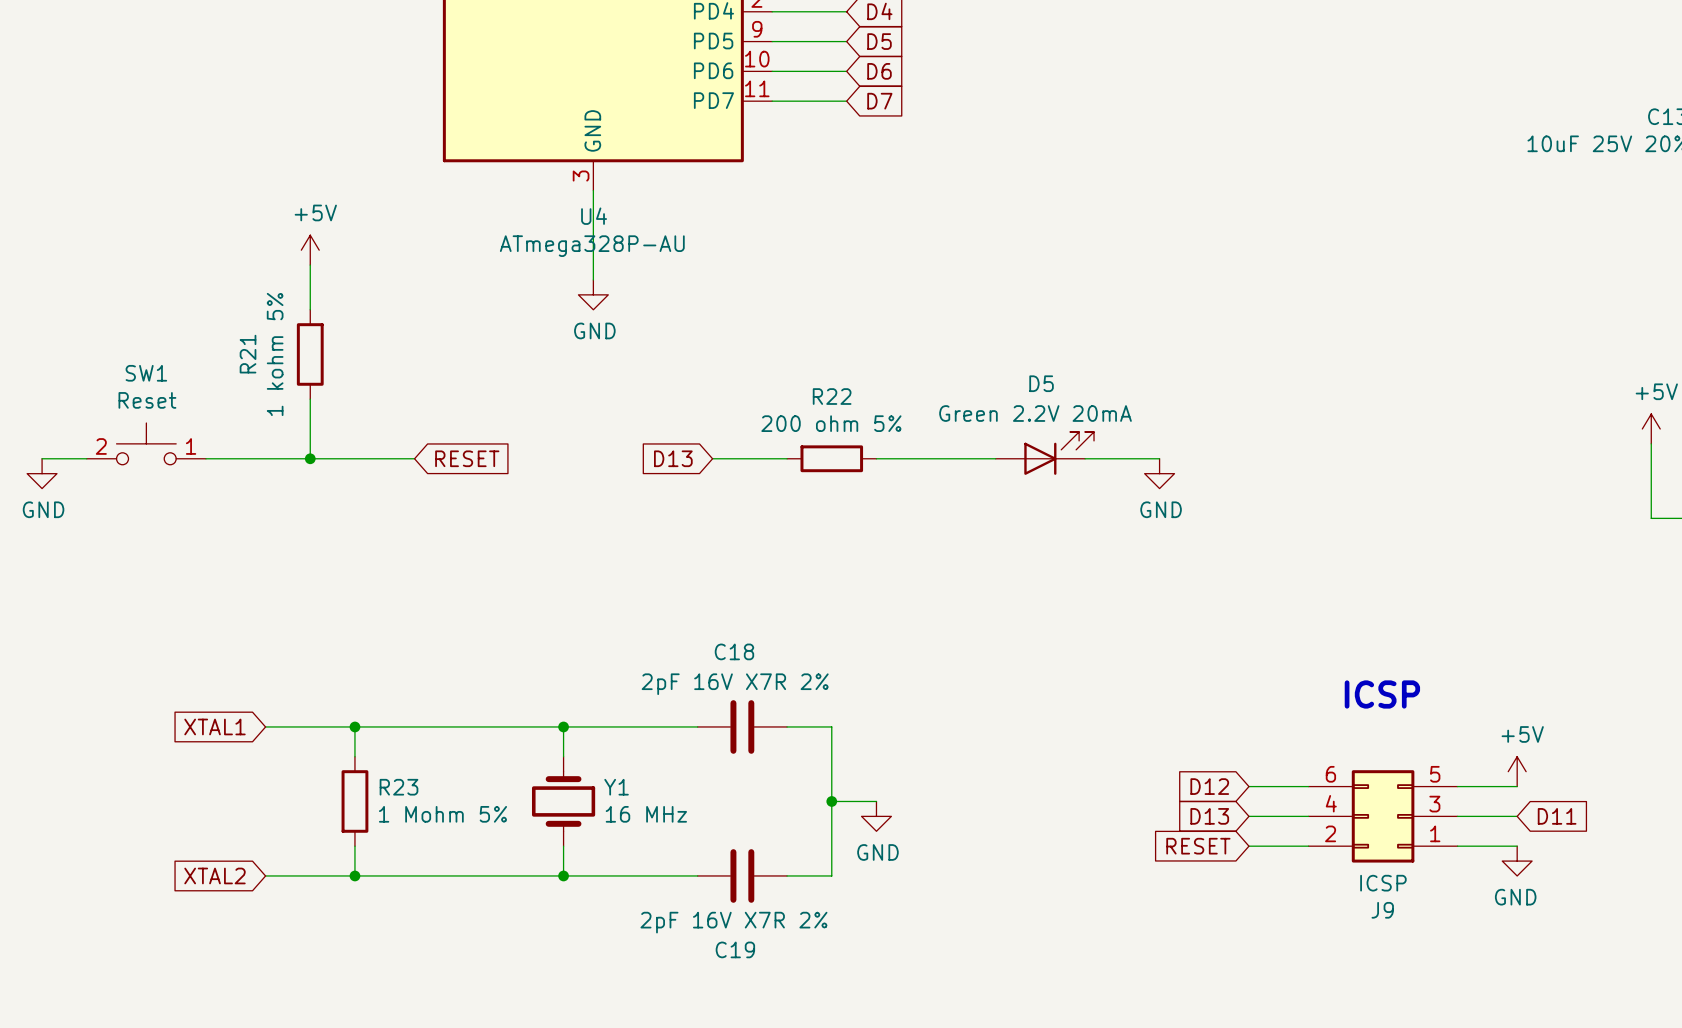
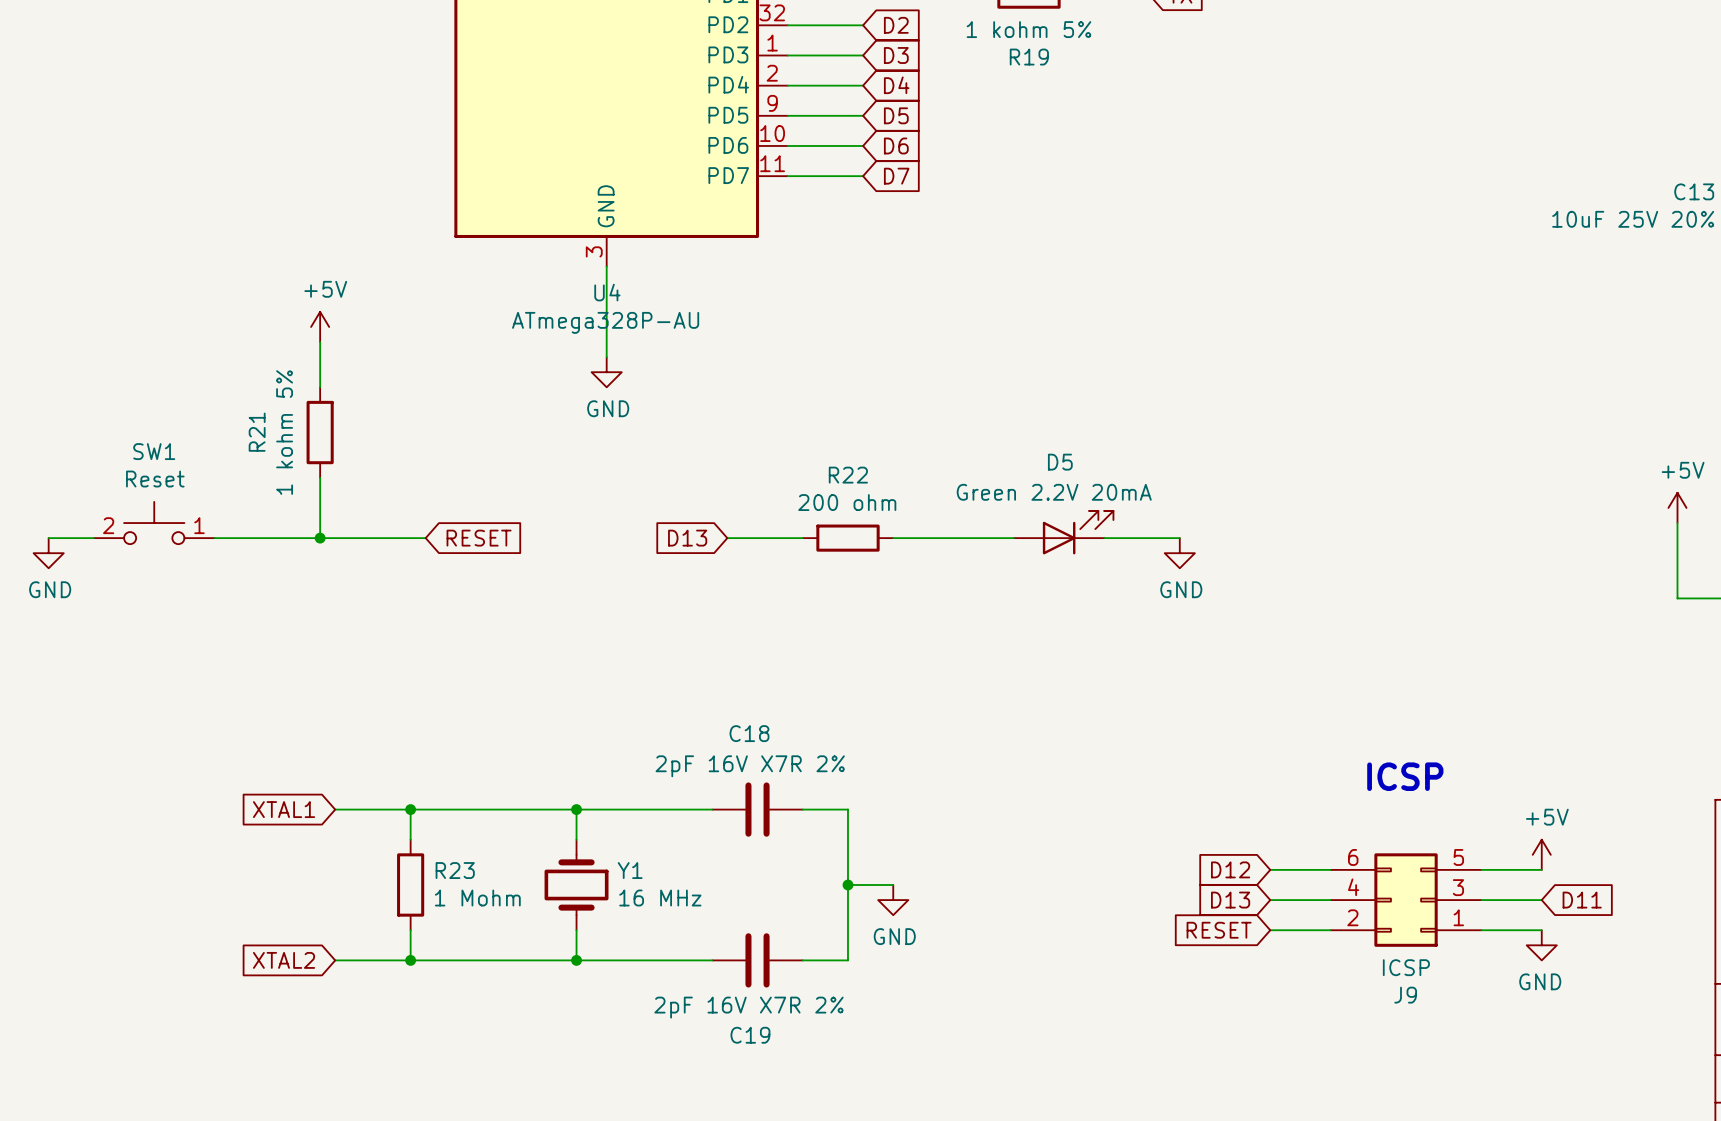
R22 value: 200 ohm 5% (831, 423) -> 200 ohm (847, 502)
global label position: XTAL1 (214, 726) -> XTAL1 (284, 809)
wire: (265, 726) (325, 726) -> none
wire: (354, 726) (354, 756) -> (410, 809) (410, 839)
junction position: (354, 726) -> (410, 809)
R23 position: (354, 801) -> (410, 884)
R23 value: 1 Mohm 5% (442, 814) -> 1 Mohm (477, 898)
wire: (354, 846) (354, 875) -> (410, 930) (410, 960)
global label position: XTAL2 (214, 875) -> XTAL2 (284, 960)
wire: (265, 875) (325, 875) -> none
junction position: (354, 875) -> (410, 960)

